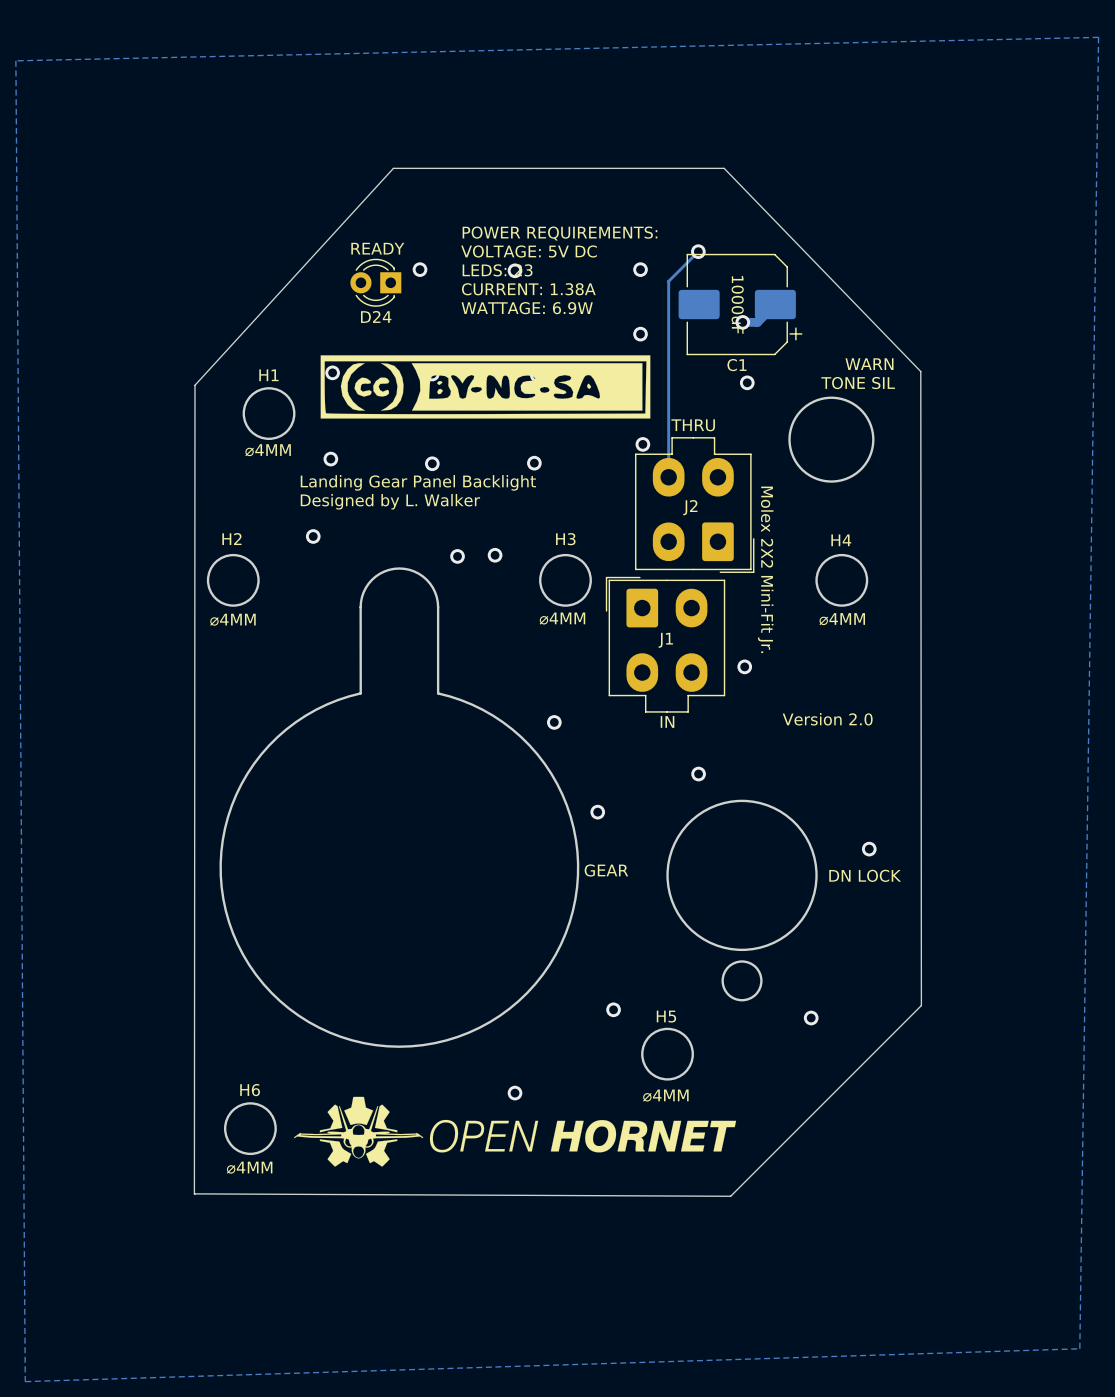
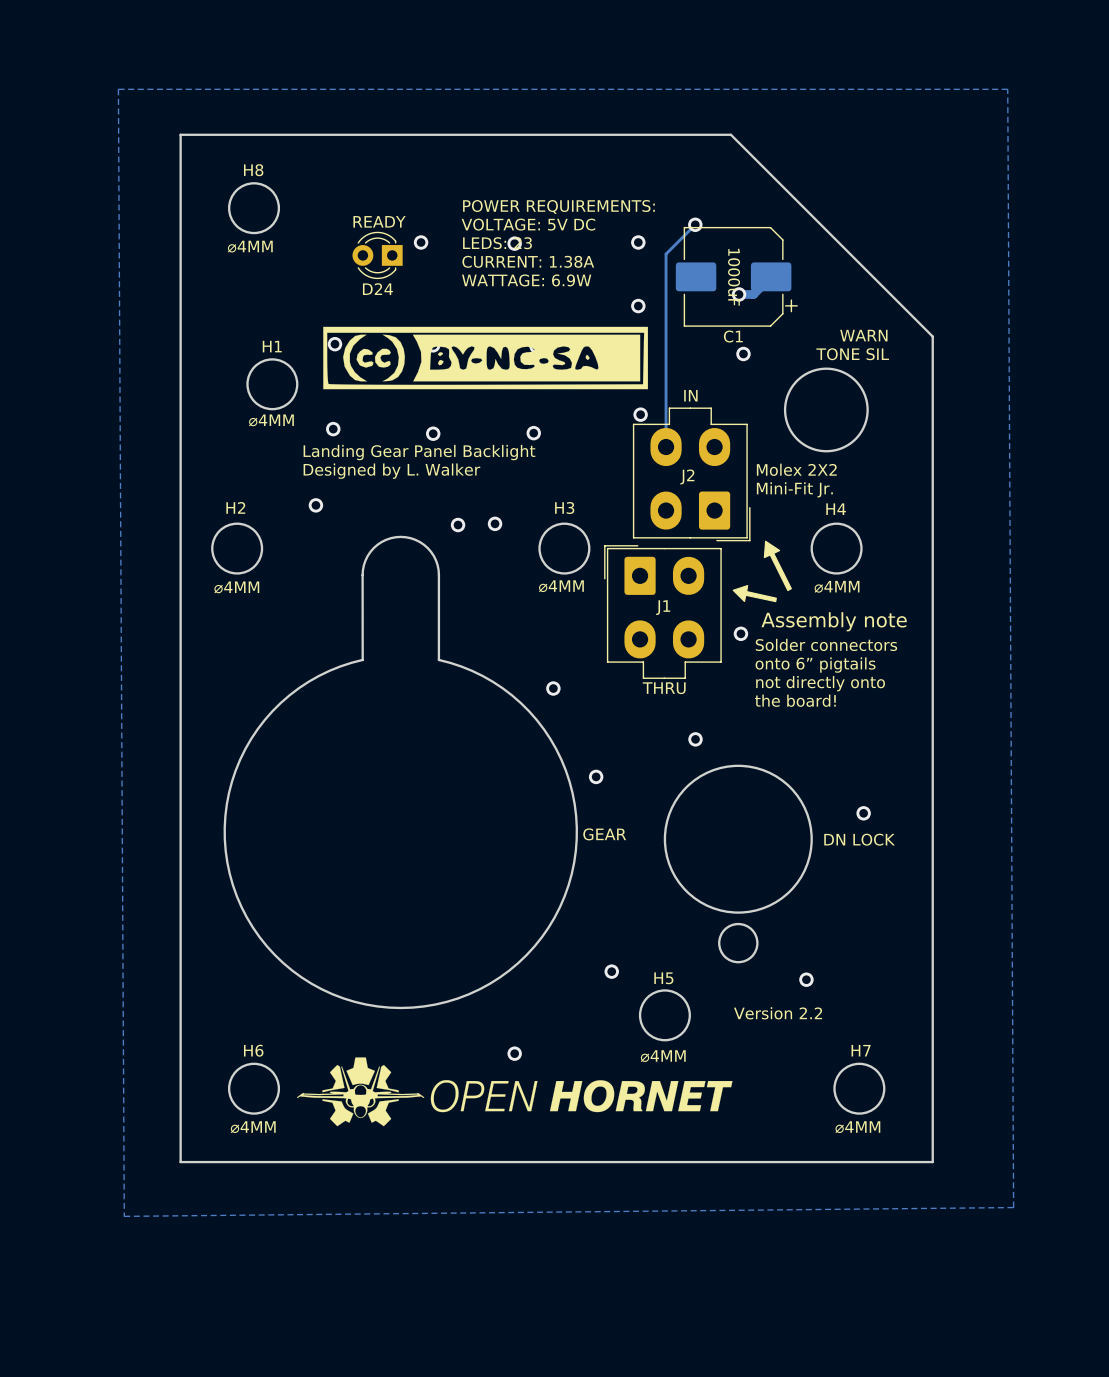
zone outline: (1098, 37) (1079, 1348) (25, 1381) (15, 60) (1098, 37) -> (1007, 89) (1013, 1207) (124, 1216) (118, 89) (1007, 89)
board edge: (724, 168) (920, 371) (921, 1005) (730, 1196) (194, 1193) (195, 385) (393, 168) (724, 168) -> (730, 134) (932, 336) (932, 1162) (180, 1162) (180, 134) (730, 134)
text: none -> H8 (253, 170)
round board edge: none -> [227, 182, 281, 235]
text: none -> ⌀4MM (250, 246)
text: THRU (693, 425) -> IN (690, 395)
text: none -> Molex 2X2 (796, 469)
text: Molex 2X2 Mini-Fit Jr. (765, 569) -> Mini-Fit Jr. (794, 489)
drawing: none -> [732, 540, 792, 603]
text: none -> Assembly note (834, 621)
text: none -> Solder connectors (826, 644)
text: none -> onto 6” pigtails (815, 665)
text: none -> not directly onto (820, 683)
text: Version 2.0 (827, 719) -> none
text: IN (667, 721) -> THRU (664, 688)
text: none -> the board! (795, 700)
text: none -> Version 2.2 (778, 1013)
text: none -> H7 (861, 1050)
round board edge: none -> [833, 1062, 886, 1115]
text: none -> ⌀4MM (857, 1127)

